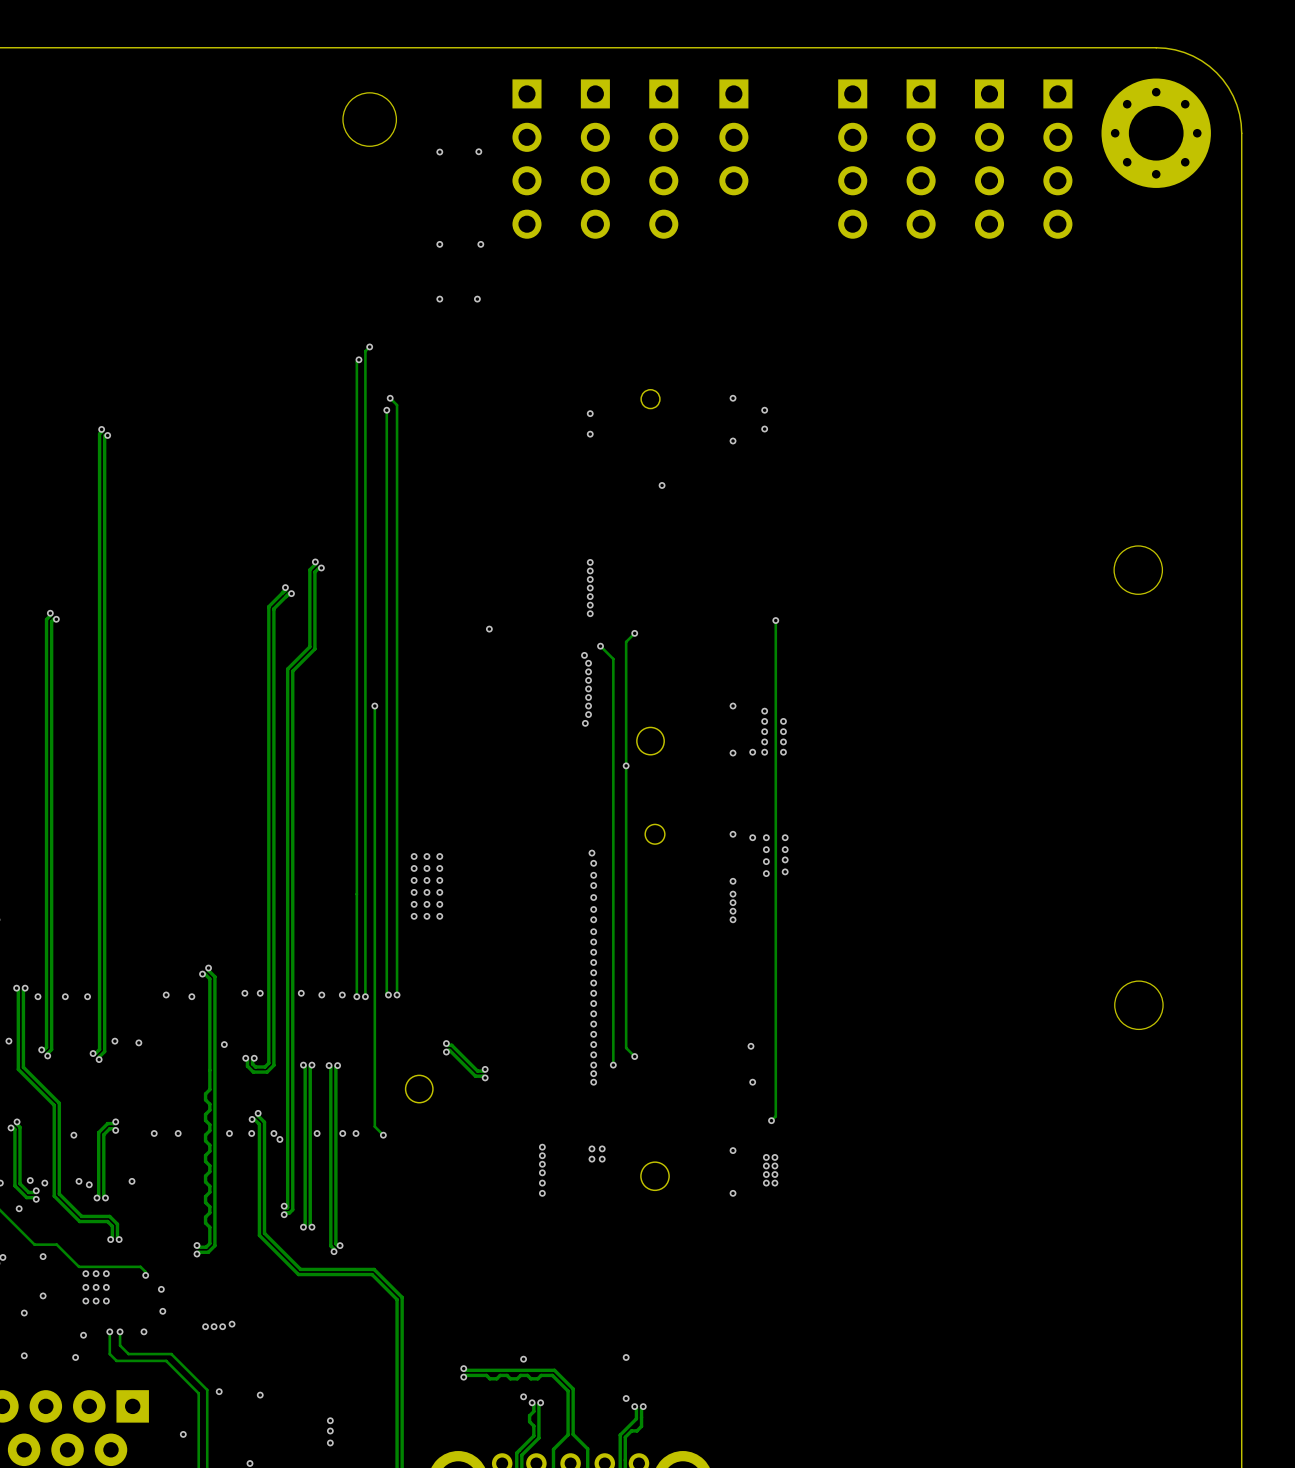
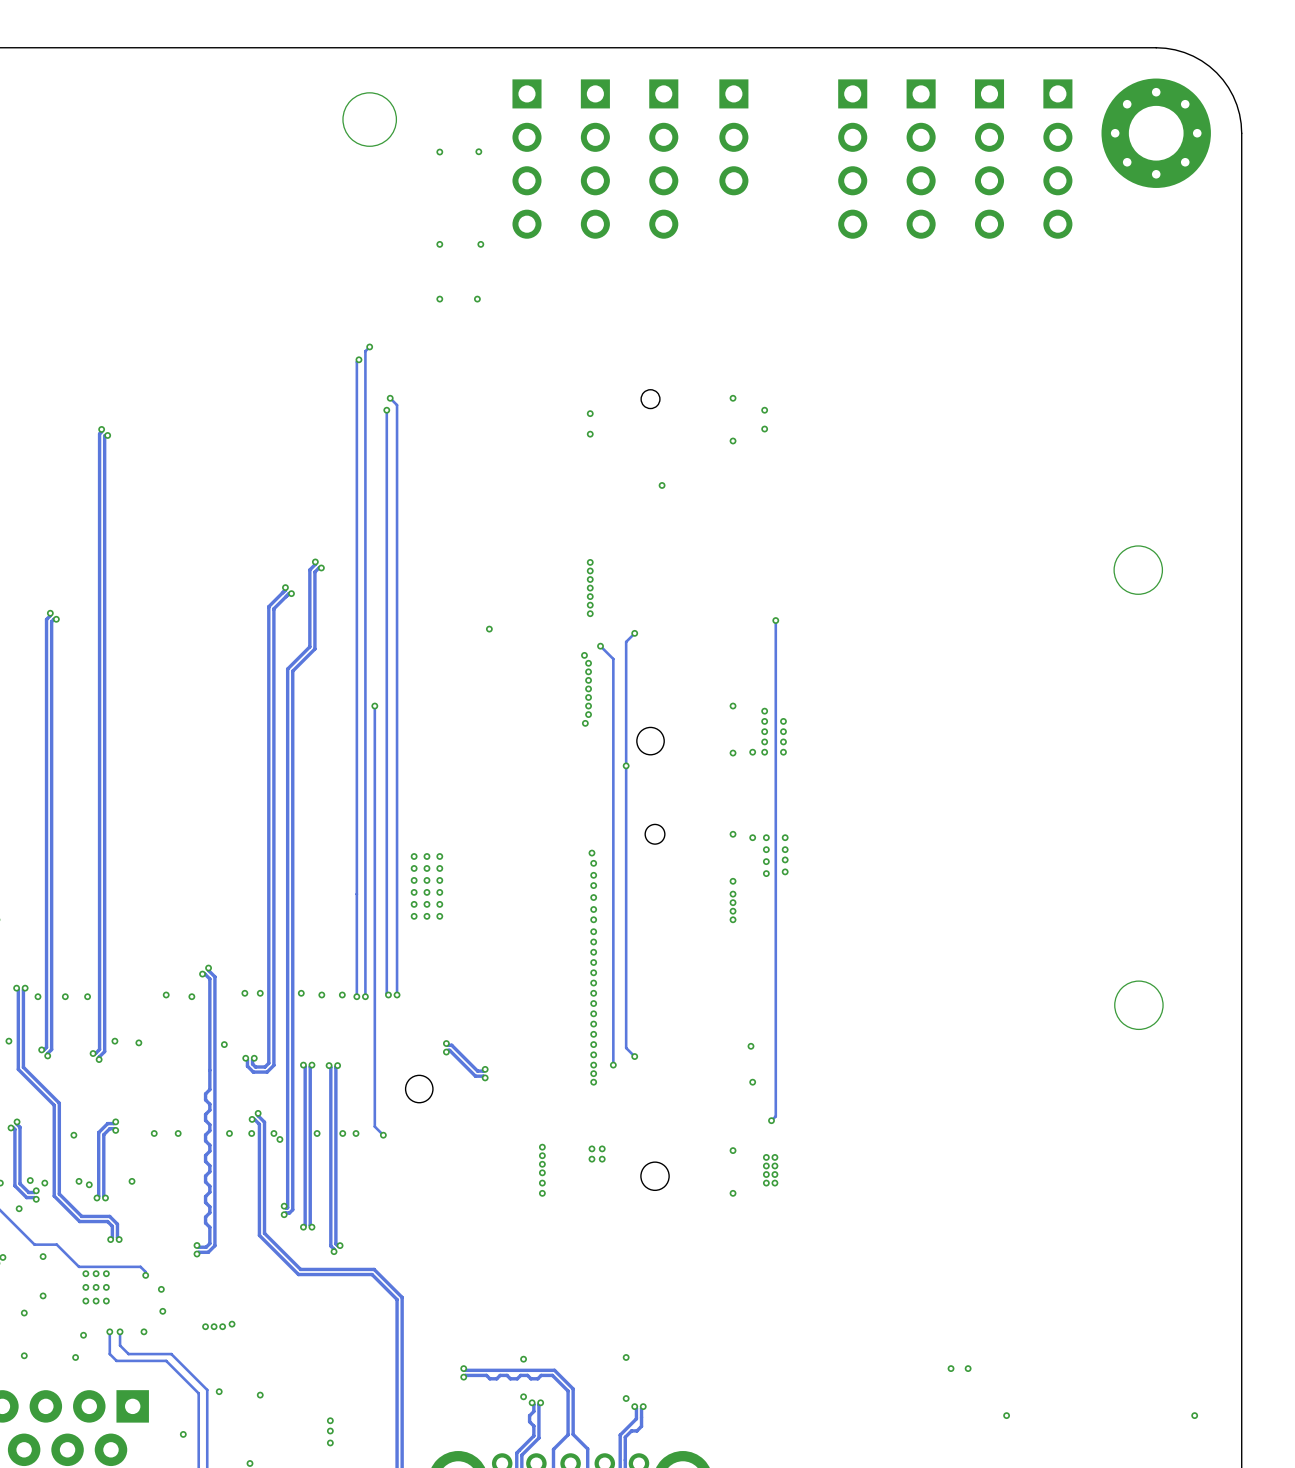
via: none -> (951, 1368)
via: none -> (968, 1368)
via: none -> (1006, 1415)
via: none -> (1194, 1415)

